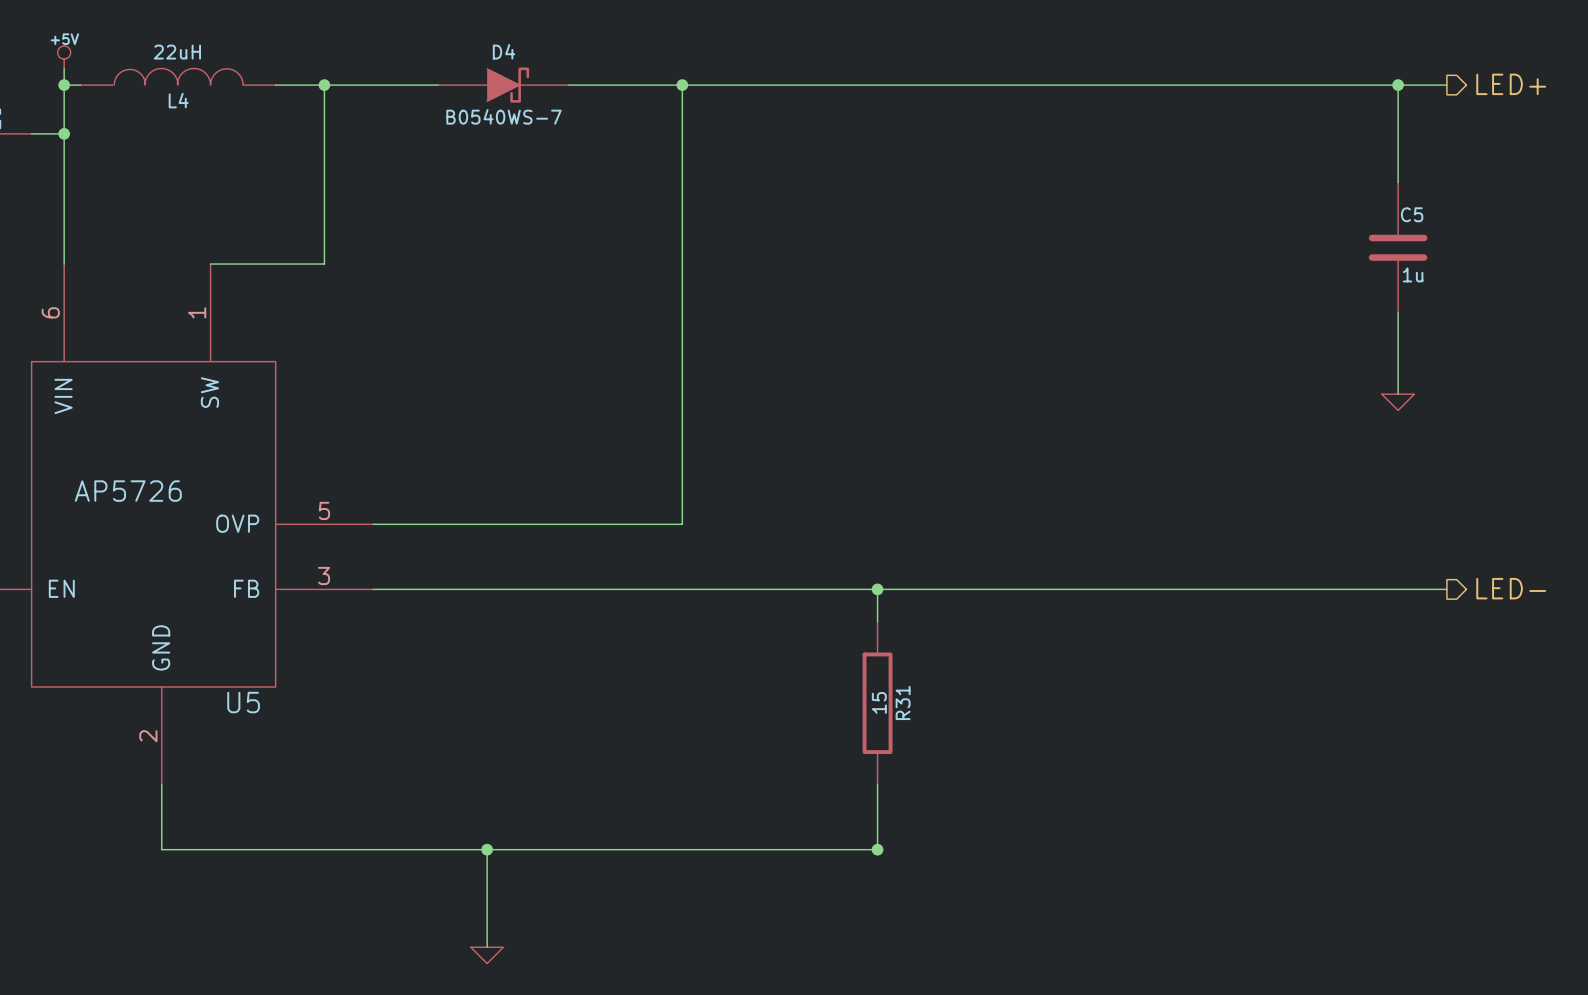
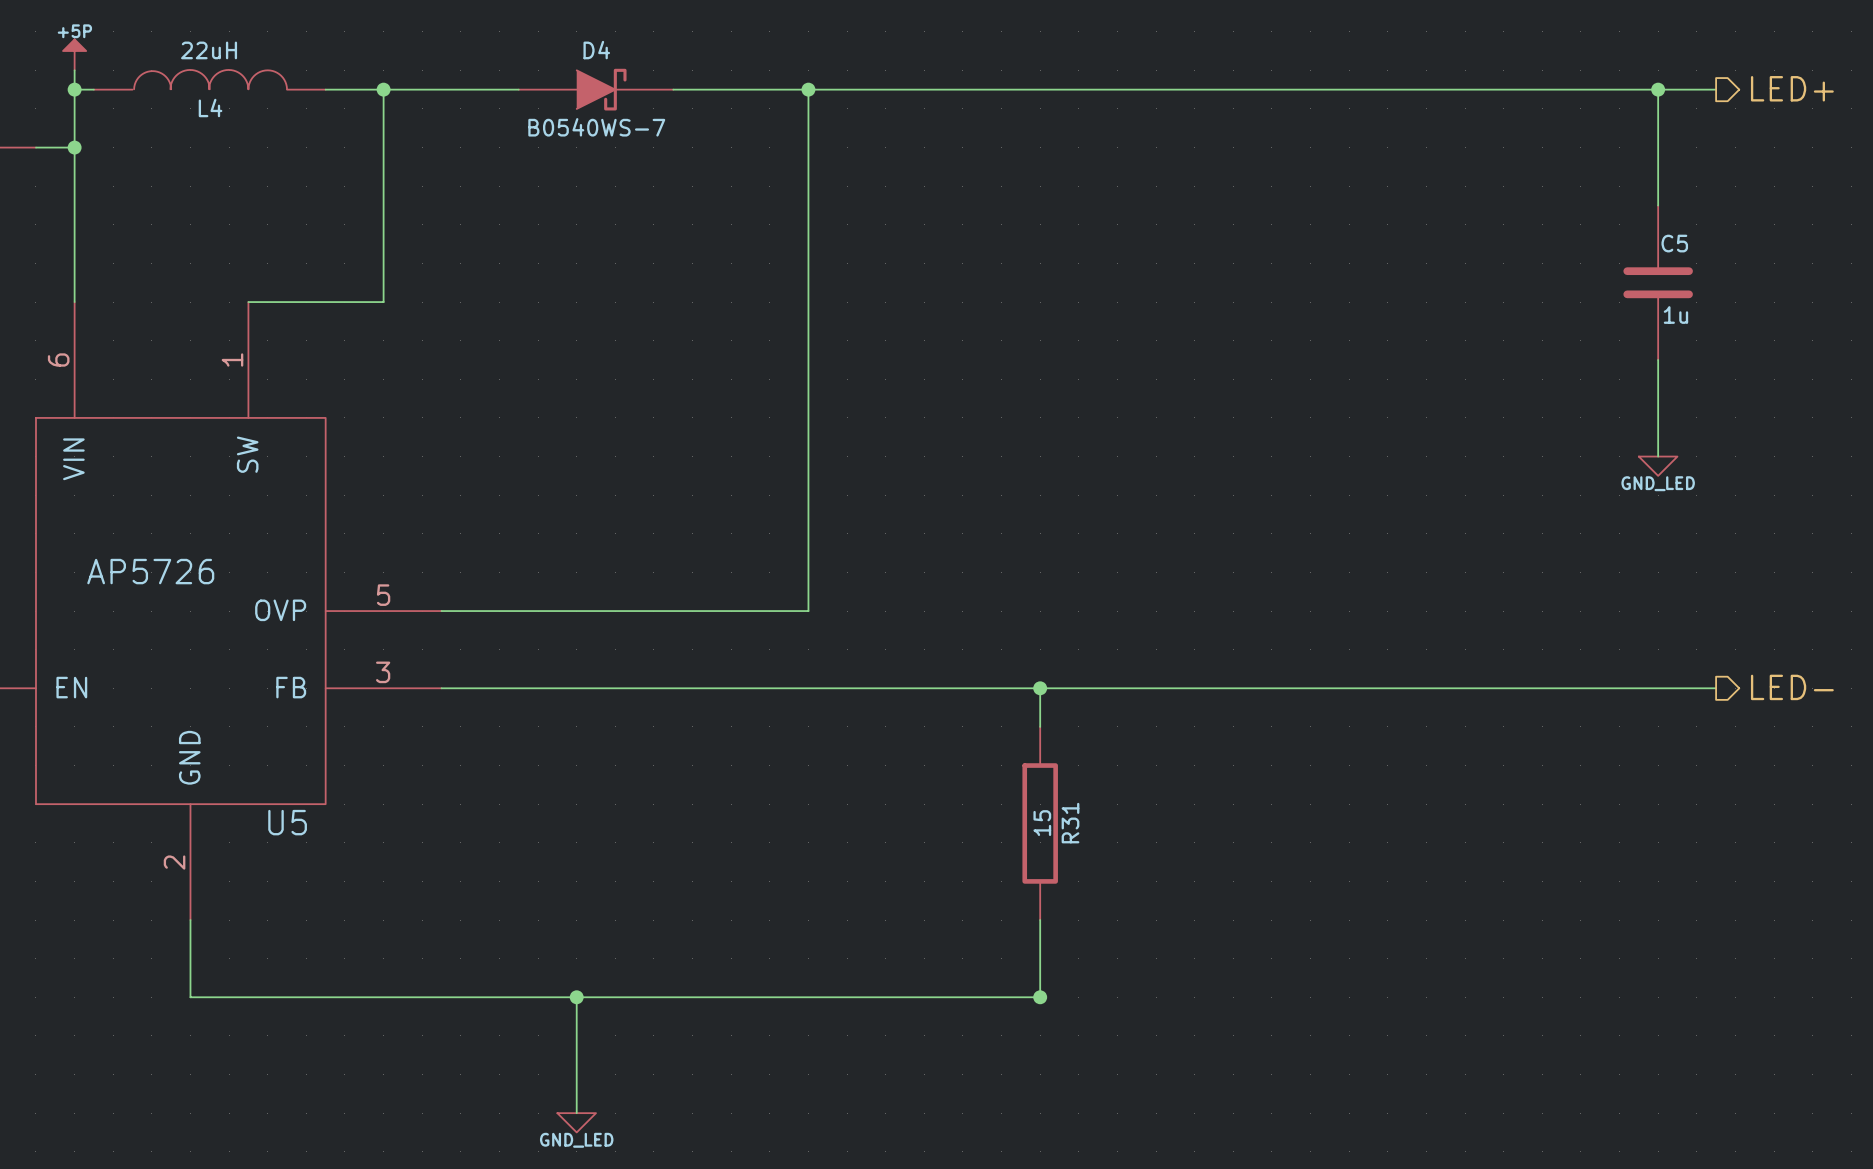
power symbol: +5V (64, 57) -> +5P (74, 54)
power symbol text: none -> GND_LED (1658, 483)
power symbol text: none -> GND_LED (576, 1140)

